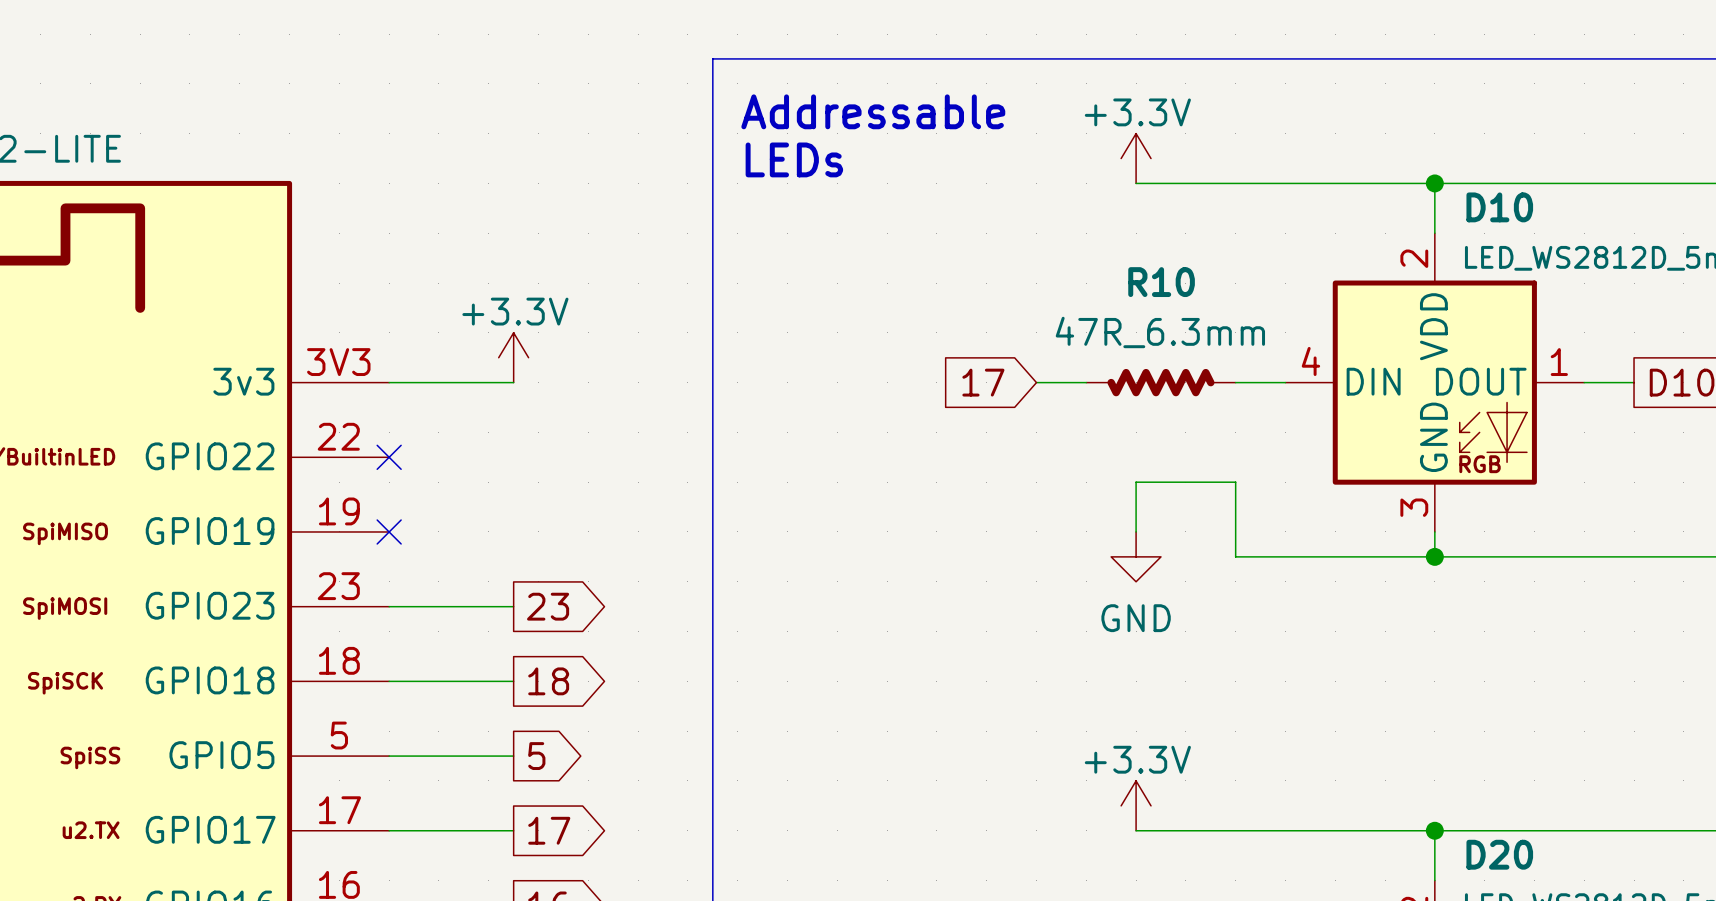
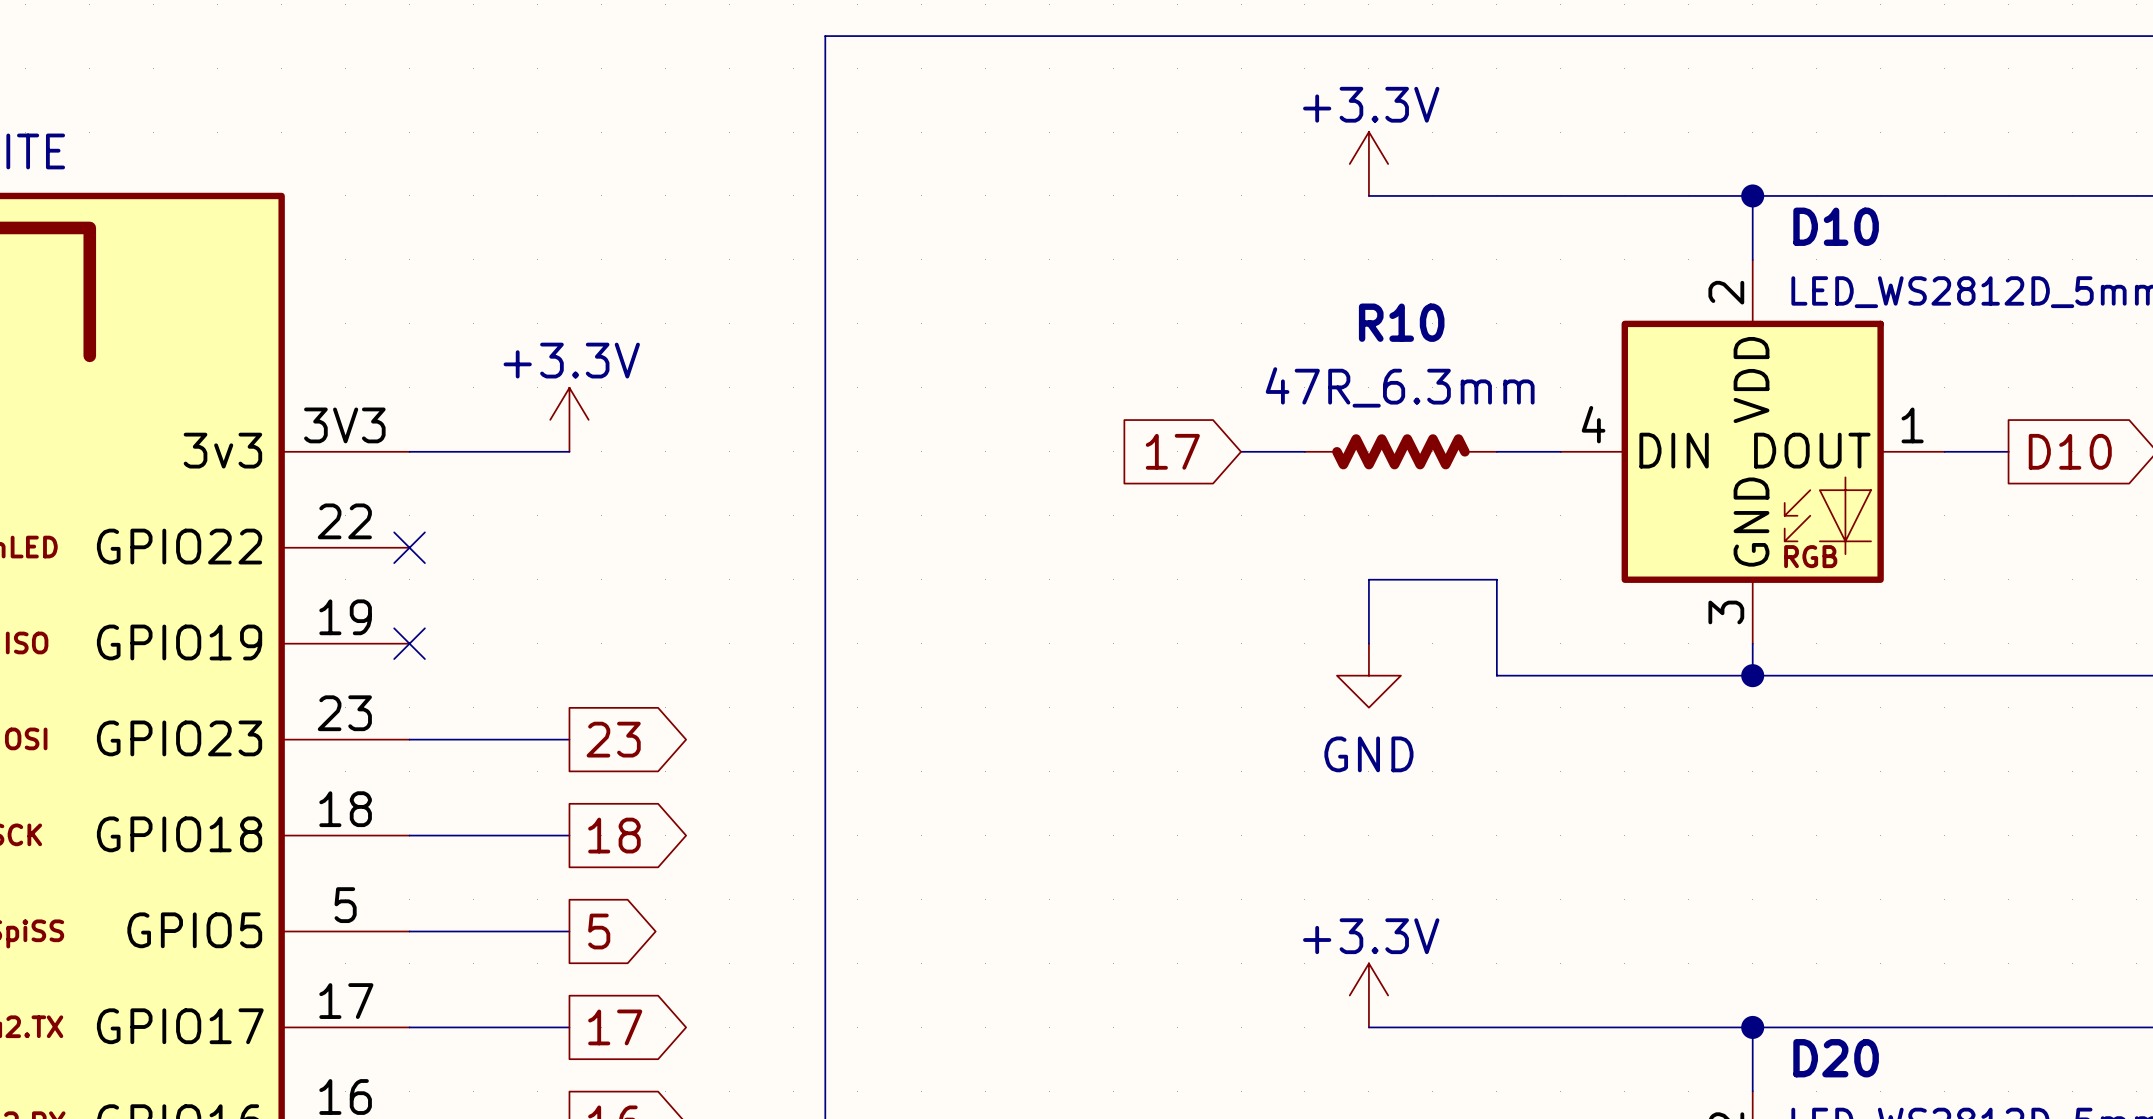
text: Addressable (873, 111) -> none
text: LEDs (794, 159) -> none

